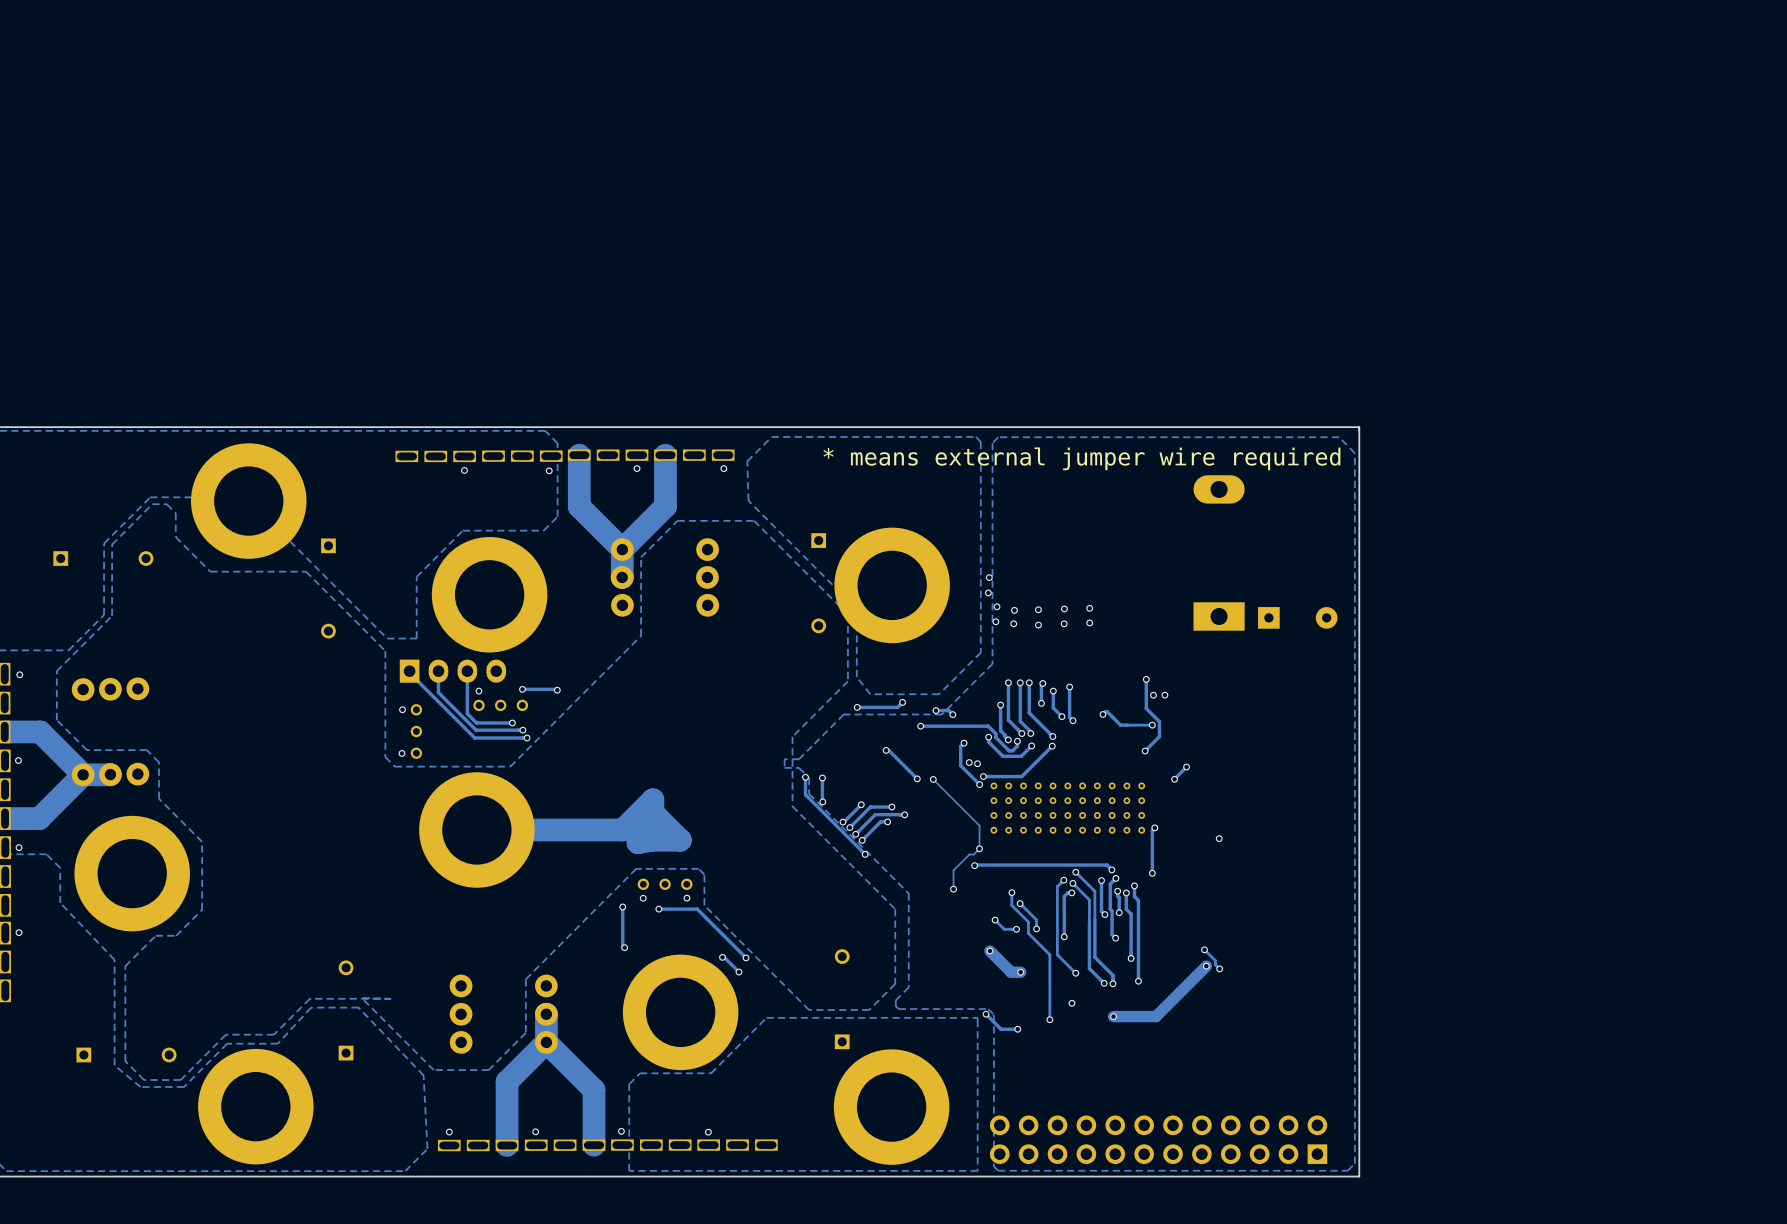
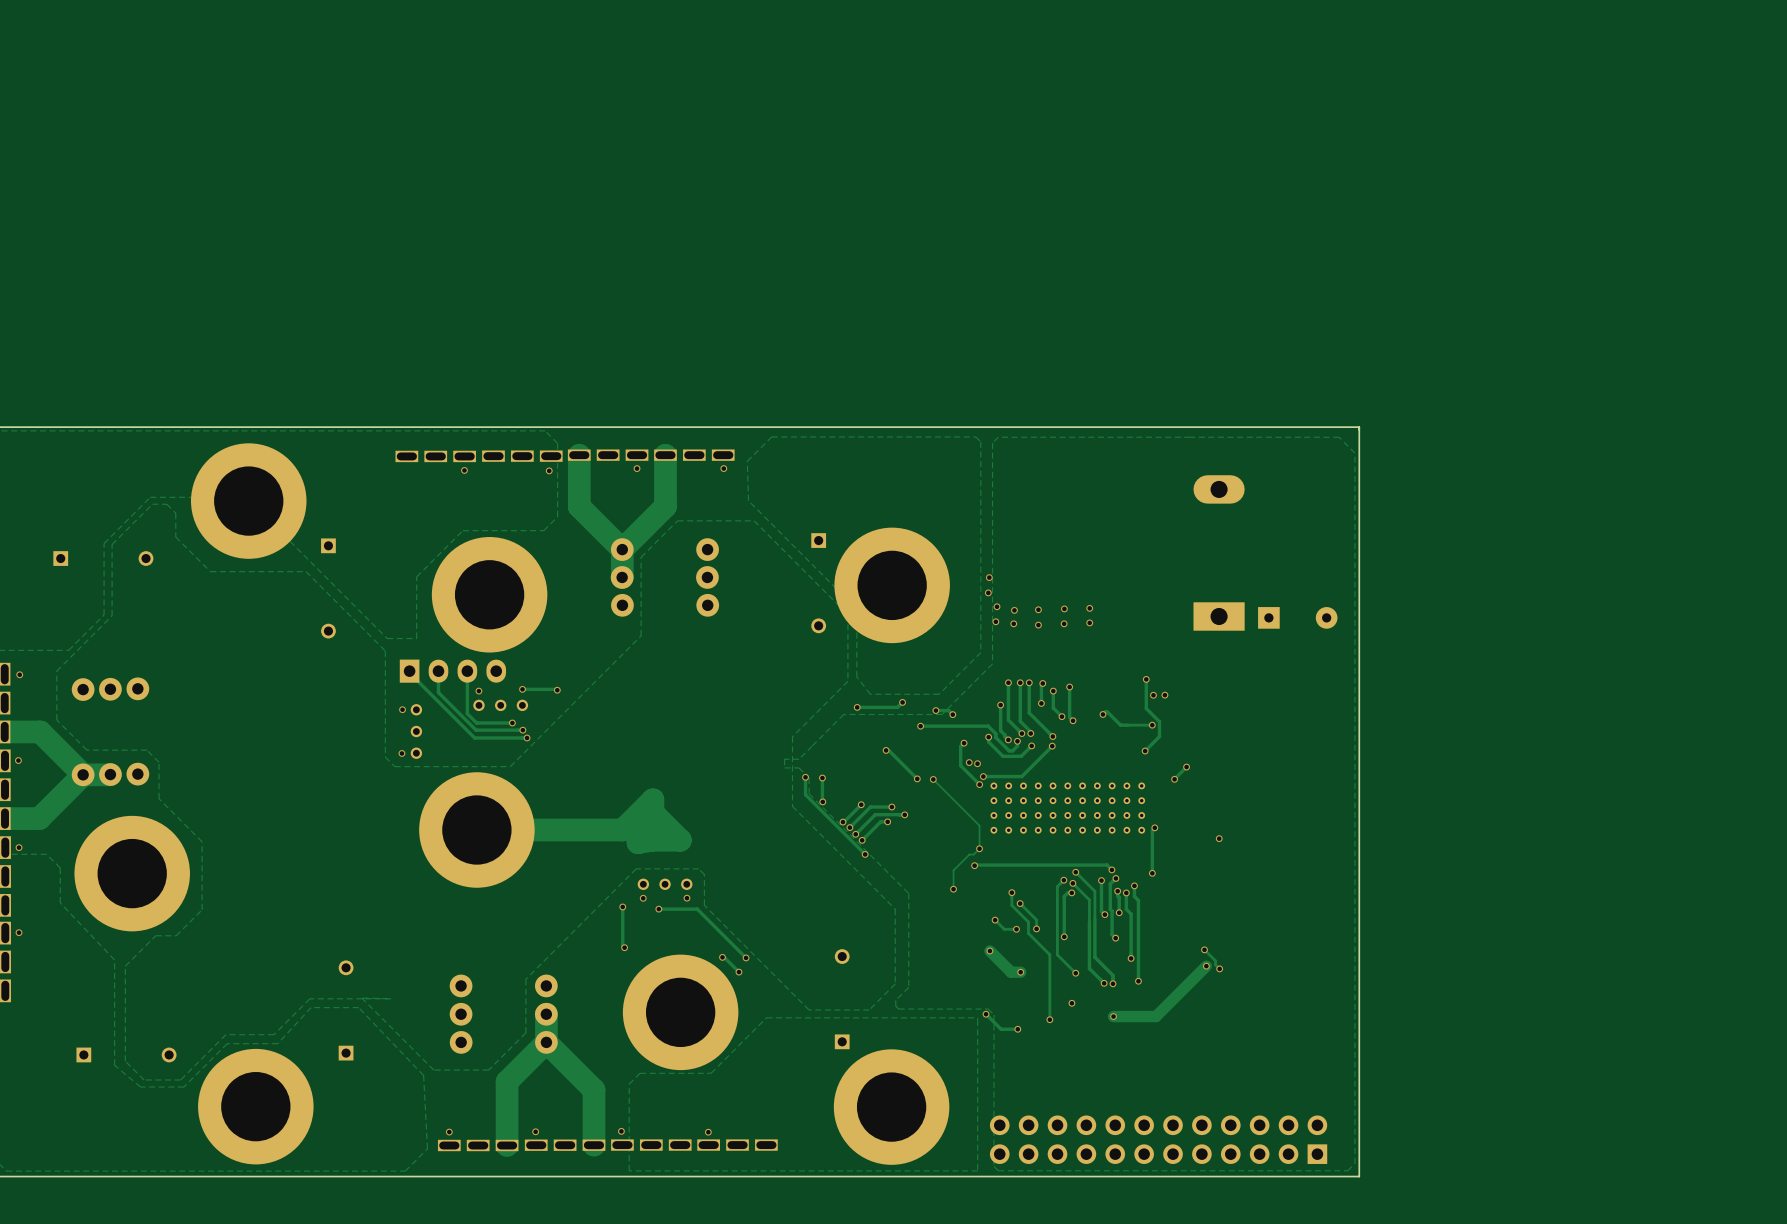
text: * means external jumper wire required (1081, 458) -> none

